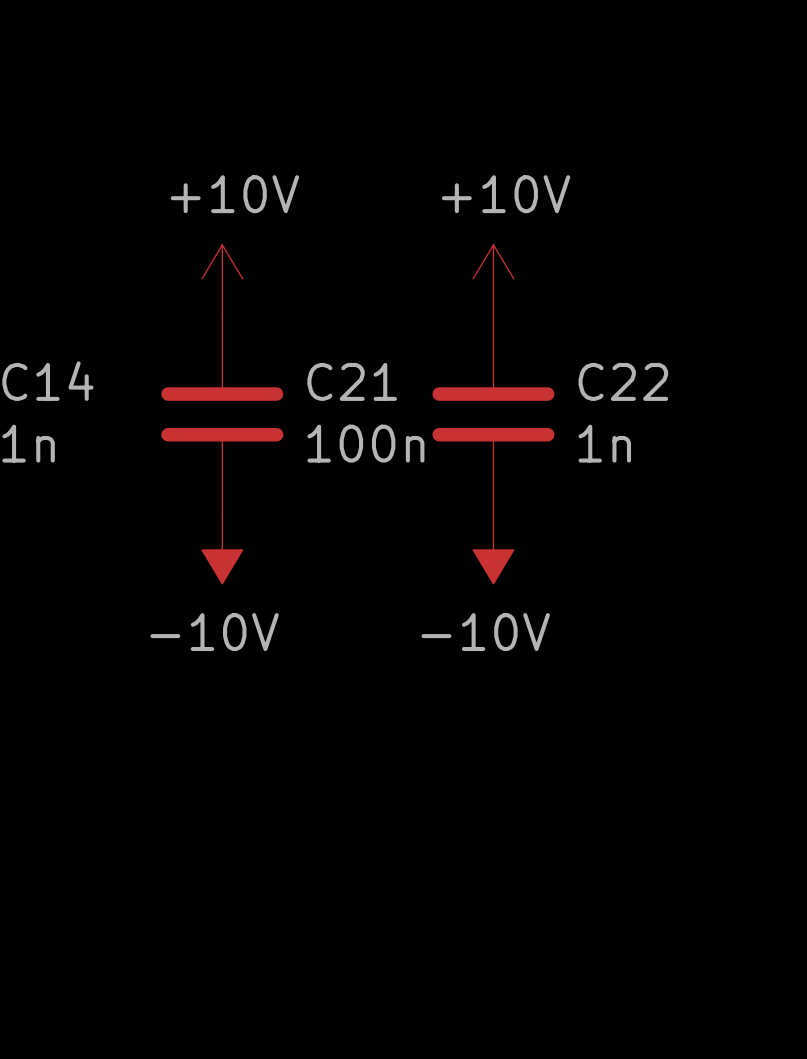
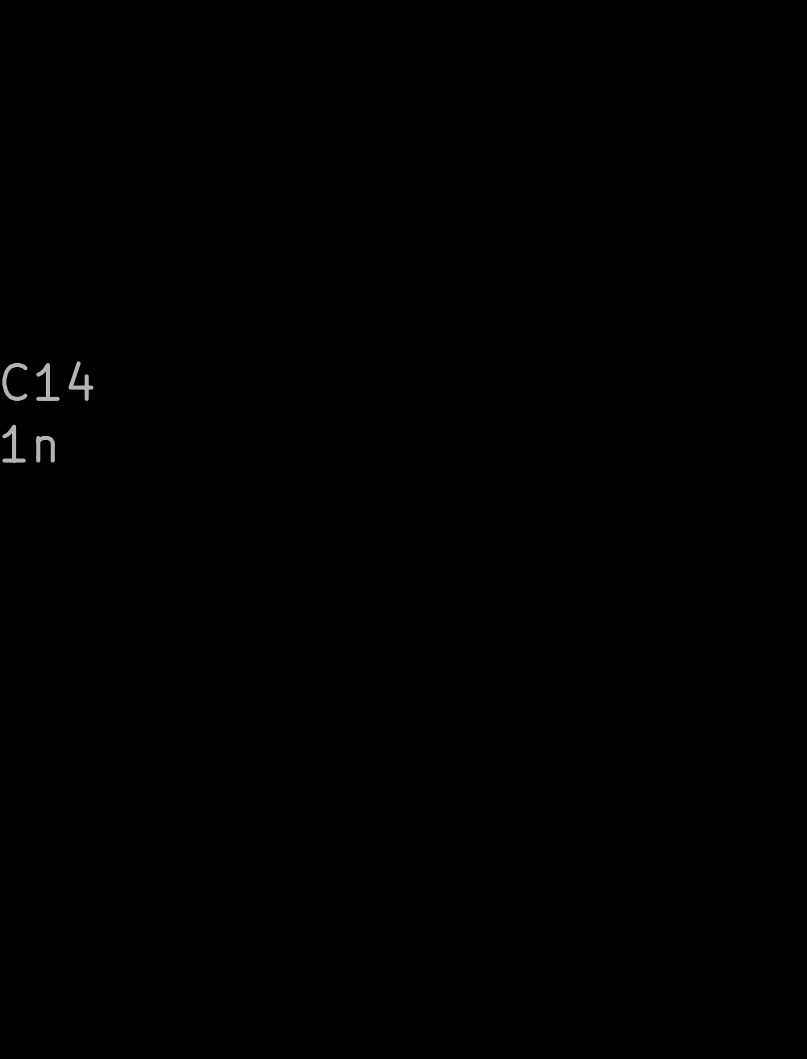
power symbol: +10V (222, 278) -> none
power symbol: +10V (493, 278) -> none
C21: 100n (222, 414) -> none
C22: 1n (493, 414) -> none
power symbol: -10V (222, 549) -> none
power symbol: -10V (493, 549) -> none

